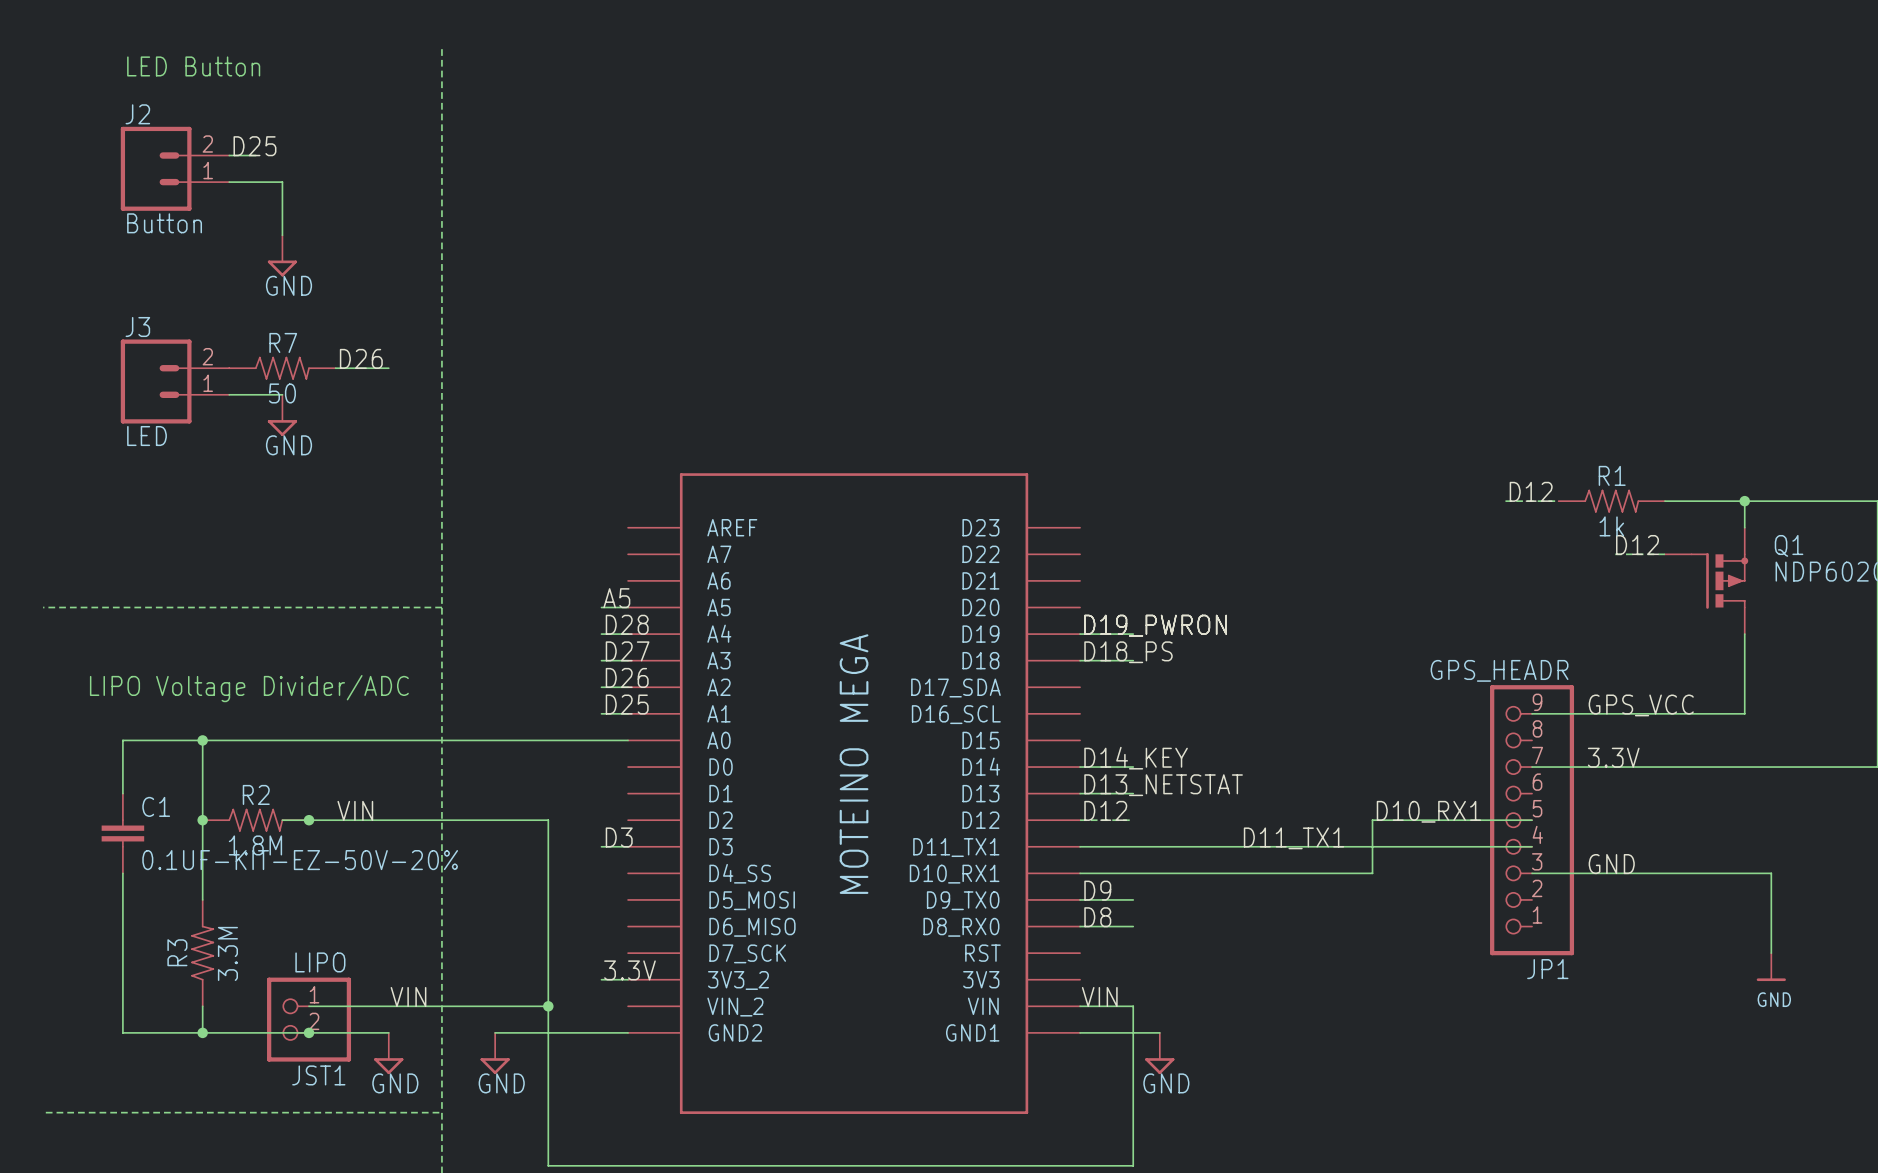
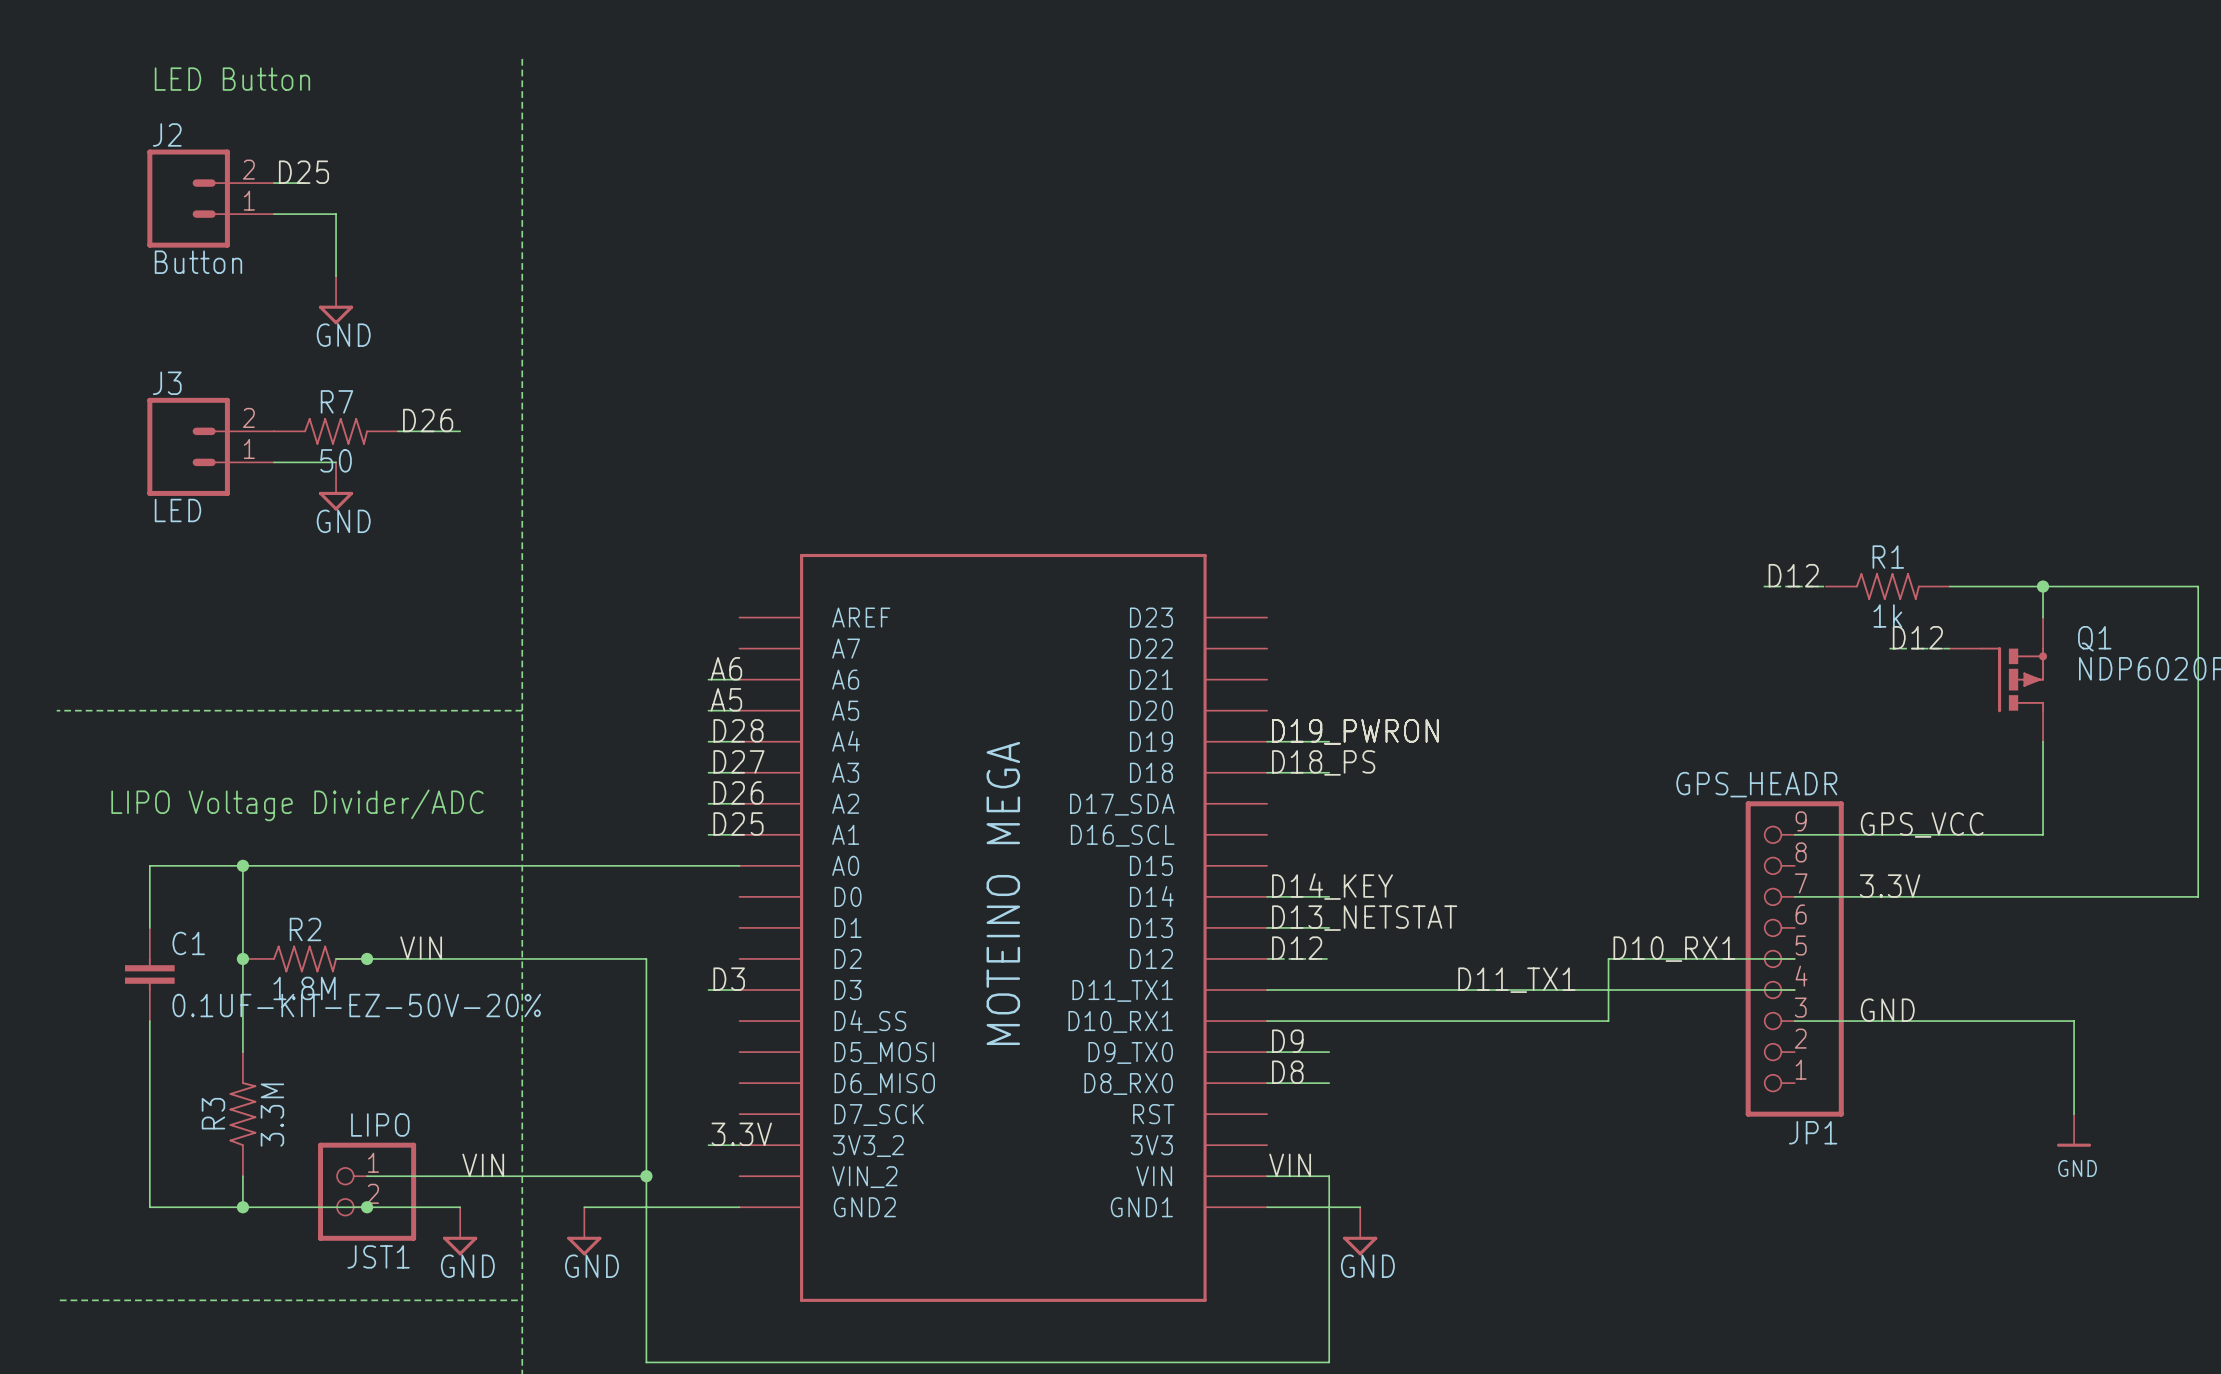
label: none -> A6 (726, 668)
wire: none -> (708, 679) (739, 679)

